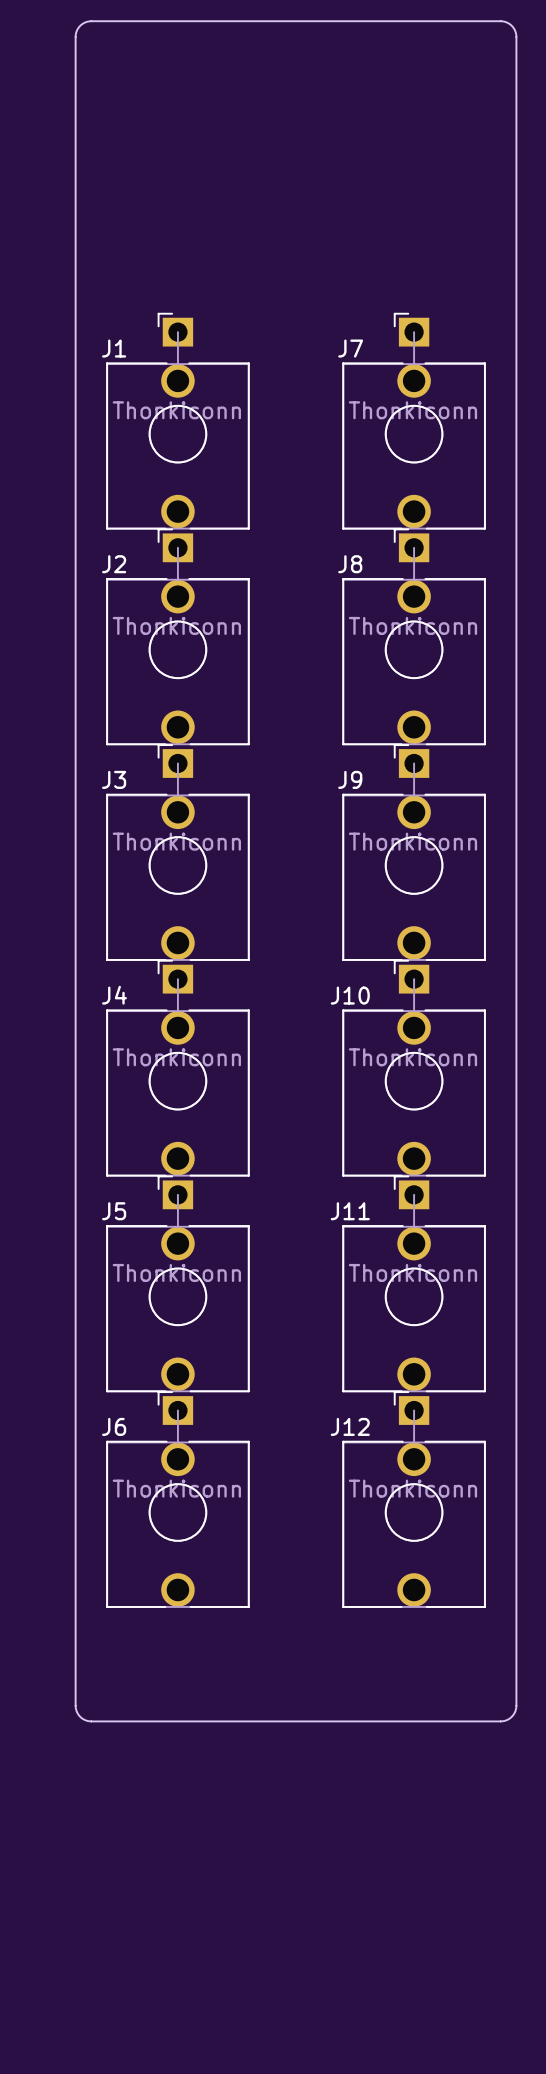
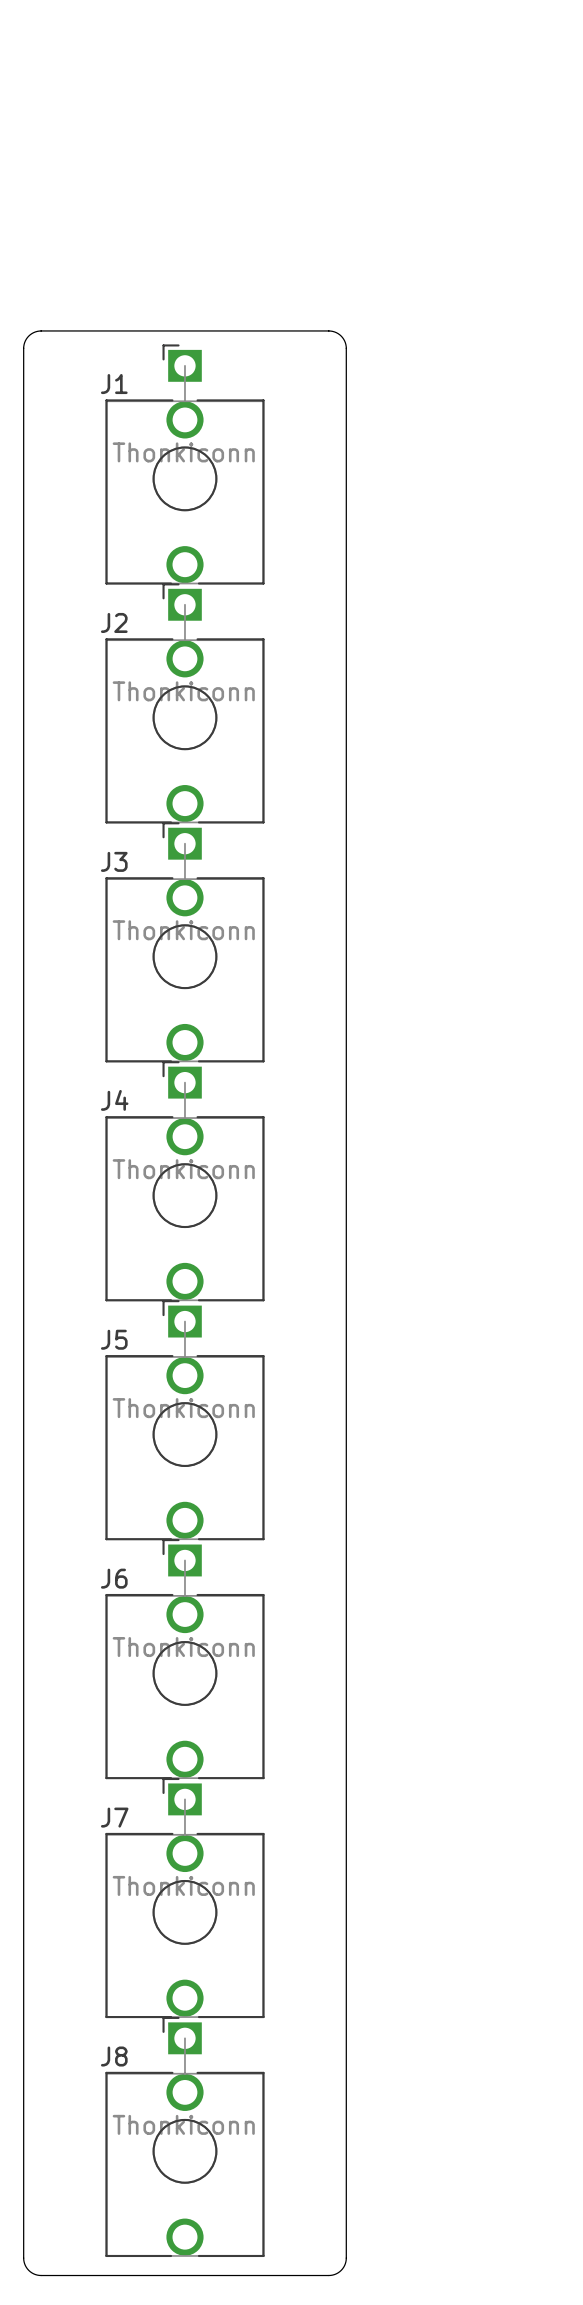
board edge: (91, 21) (500, 21) (510, 24) (516, 33) (516, 1705) (512, 1715) (504, 1721) (91, 1721) (81, 1717) (76, 1709) (75, 36) (80, 25) (91, 21) -> none
board edge: none -> (41, 330) (328, 330) (339, 334) (346, 346) (346, 2258) (342, 2268) (330, 2275) (41, 2275) (28, 2270) (23, 2260) (23, 348) (28, 336) (41, 330)
J7 position: (414, 421) -> (184, 1898)
J8 position: (414, 636) -> (184, 2136)
J9: Thonkiconn (414, 852) -> none
J10: Thonkiconn (414, 1068) -> none
J11: Thonkiconn (414, 1283) -> none
J12: Thonkiconn (414, 1499) -> none

